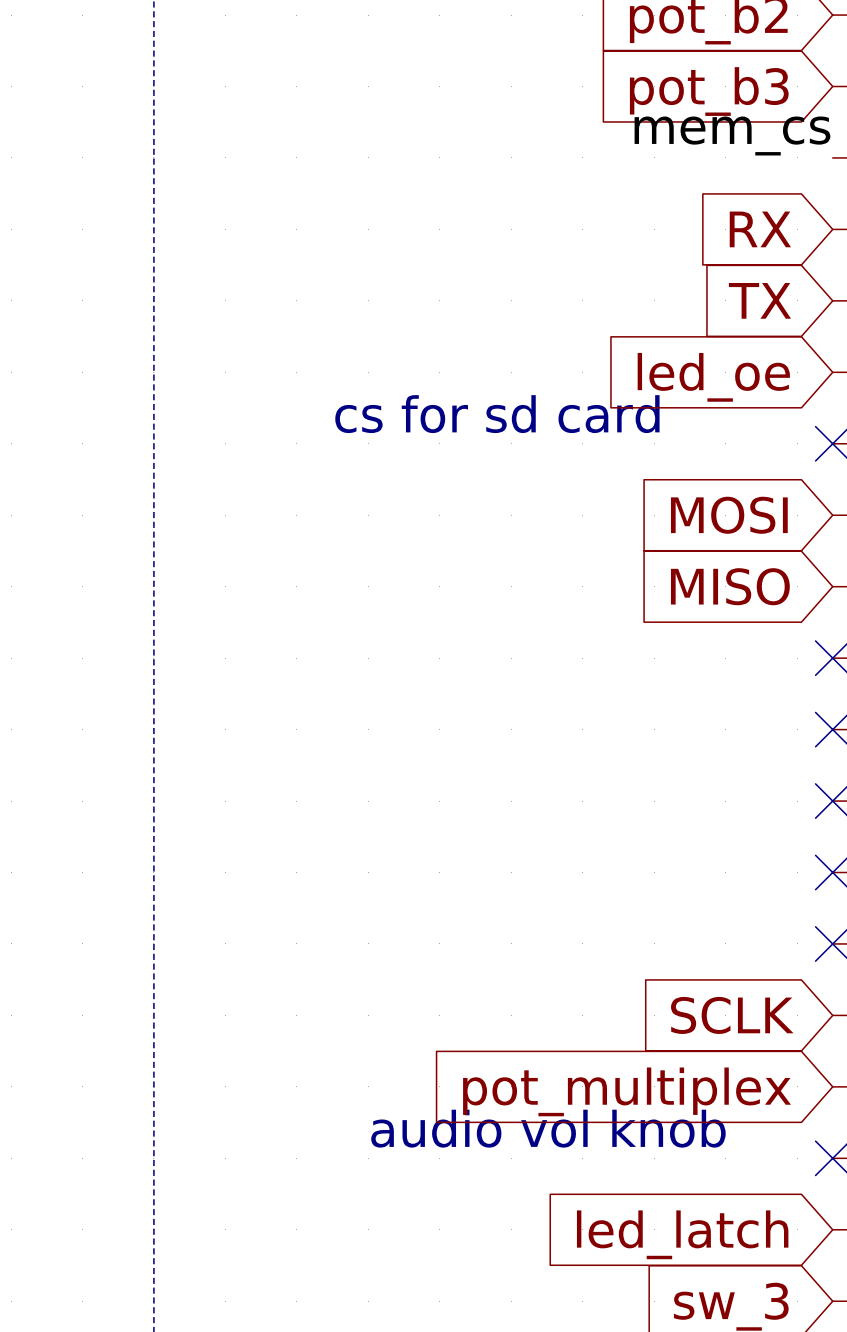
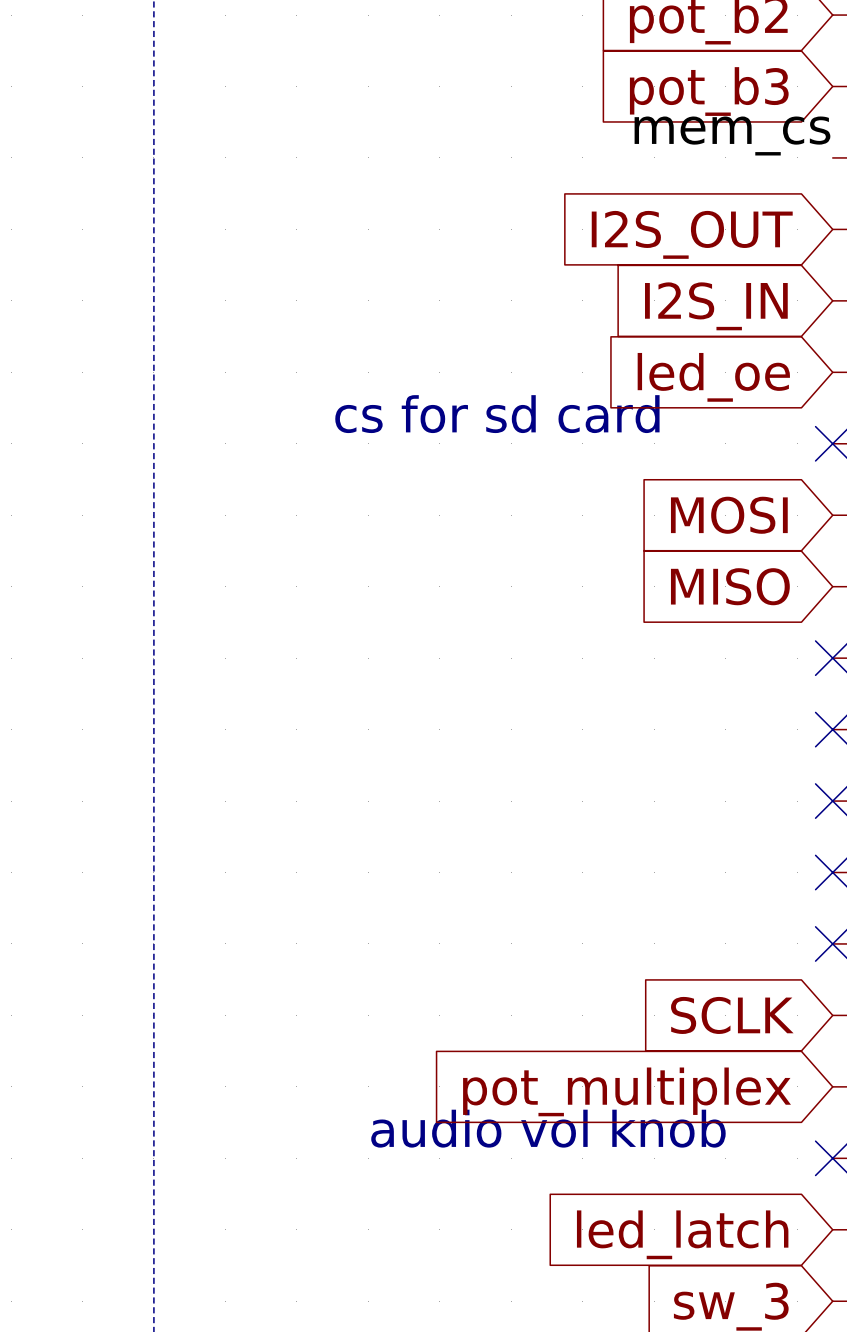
global label: RX (760, 229) -> I2S_OUT (692, 234)
global label: TX (759, 300) -> I2S_IN (716, 306)

